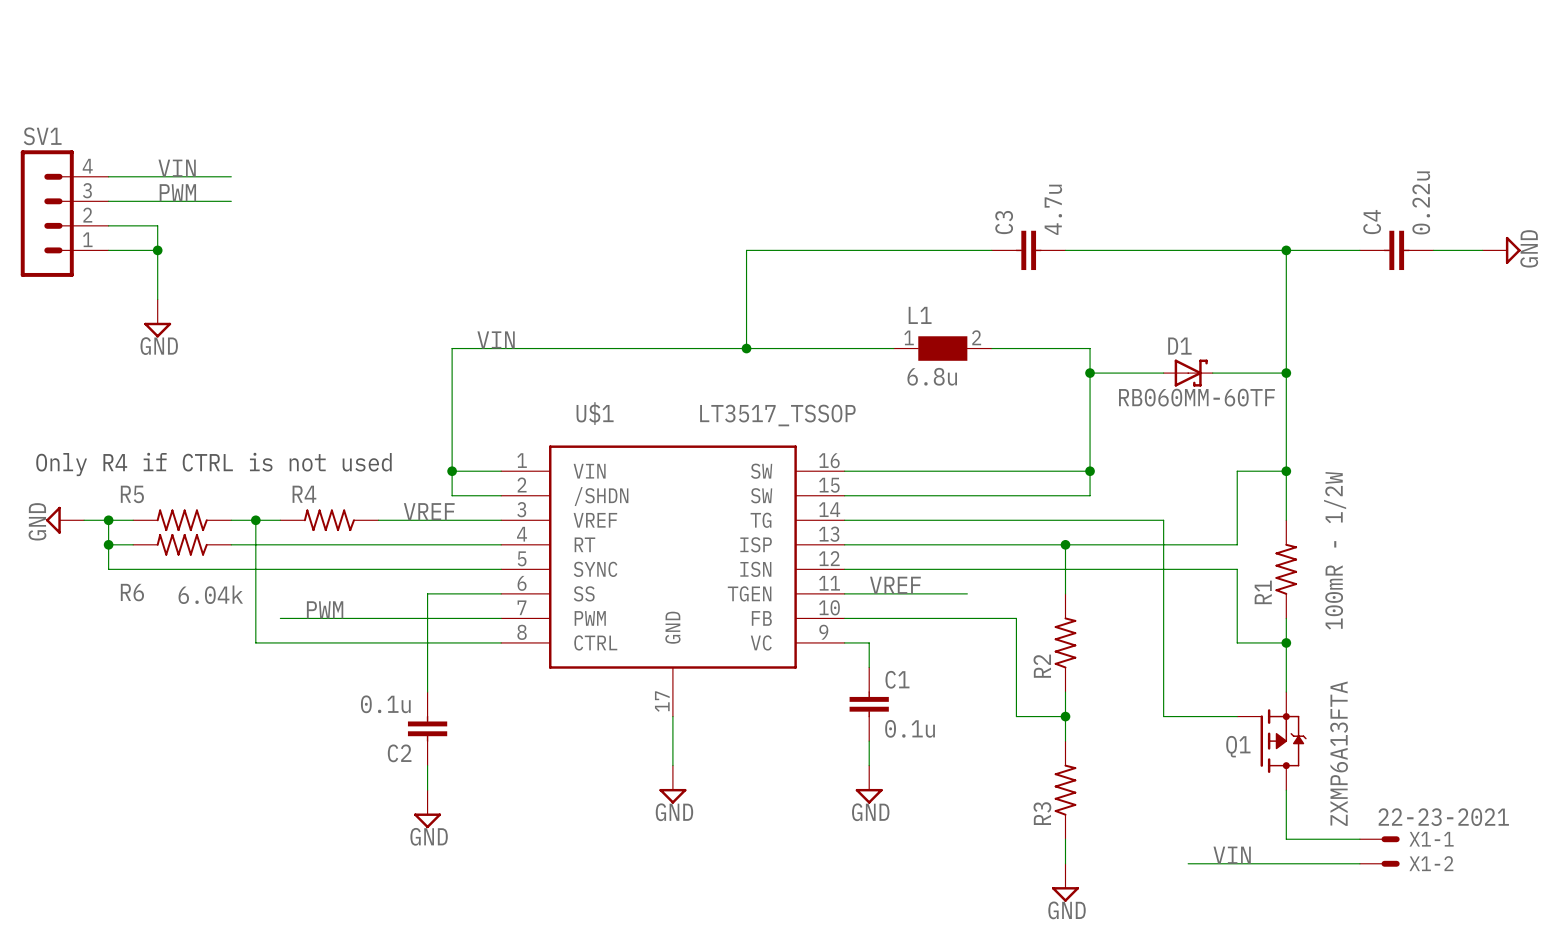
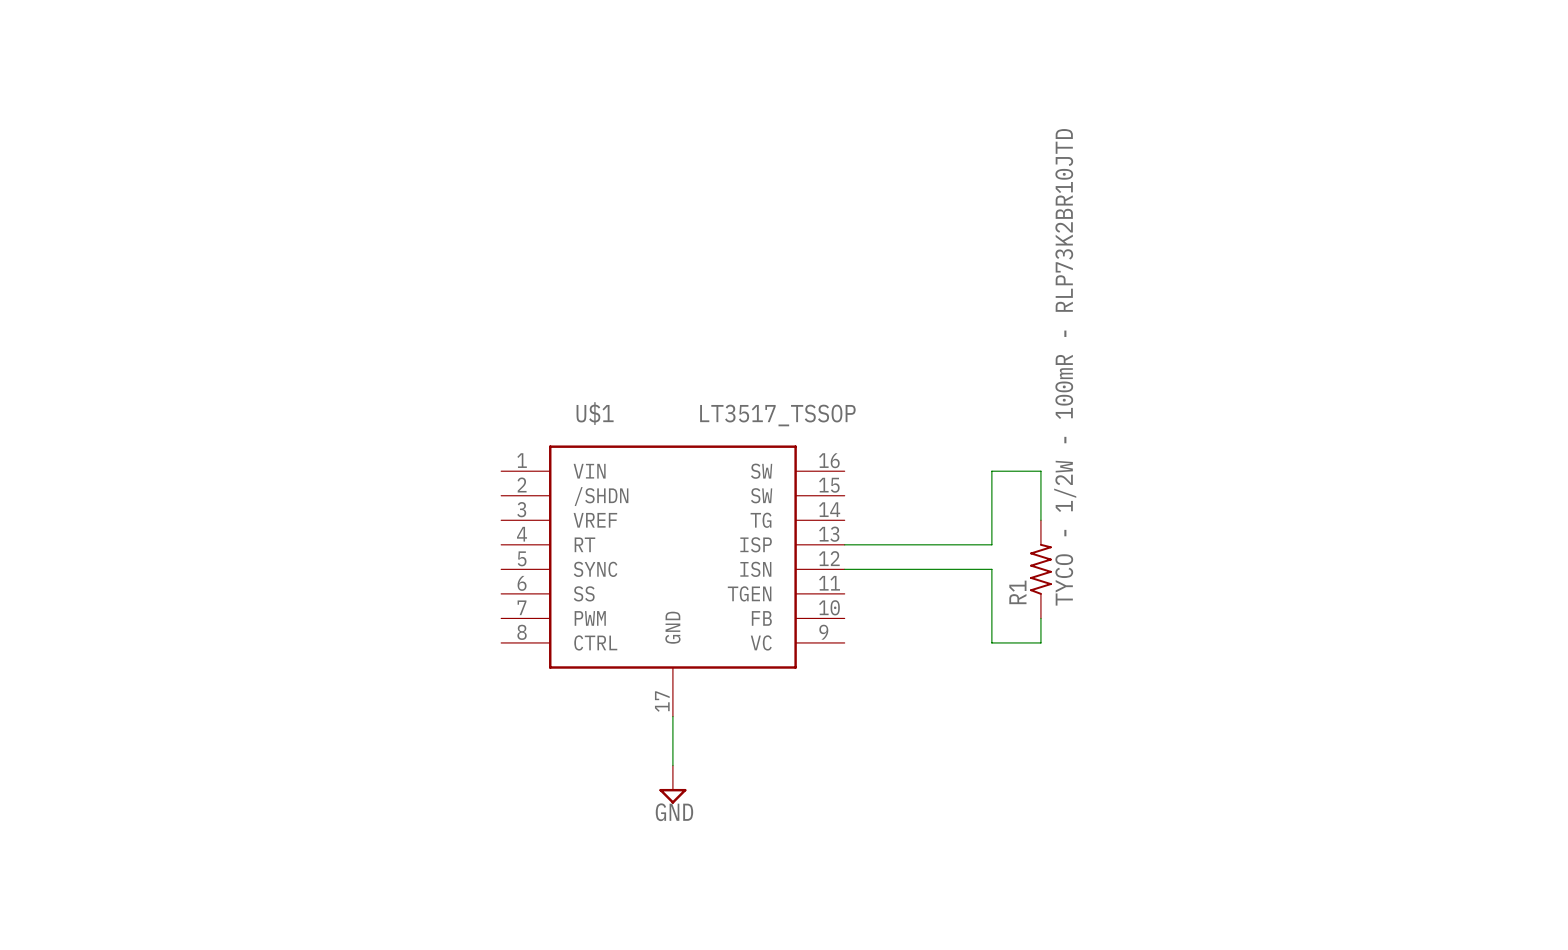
label: VIN (177, 168) -> none
wire: (108, 176) (231, 176) -> none
label: PWM (177, 192) -> none
wire: (108, 201) (231, 201) -> none
SV1: (64, 213) -> none
wire: (108, 225) (157, 225) (157, 299) -> none
wire: (108, 250) (157, 250) -> none
junction: (157, 250) -> none
wire: (991, 250) (746, 250) (746, 348) -> none
C3: 4.7u (1028, 250) -> none
wire: (1065, 250) (1359, 250) -> none
wire: (1286, 250) (1286, 520) -> none
junction: (1286, 250) -> none
C4: 0.22u (1396, 250) -> none
wire: (1433, 250) (1482, 250) -> none
power symbol: GND (1501, 250) -> none
power symbol: GND (157, 318) -> none
label: VIN (496, 339) -> none
junction: (746, 348) -> none
wire: (893, 348) (452, 348) (452, 495) (501, 495) -> none
L1: 6.8u (942, 348) -> none
wire: (991, 348) (1090, 348) (1090, 495) (844, 495) -> none
wire: (1090, 373) (1163, 373) -> none
junction: (1090, 373) -> none
D1: RB060MM-60TF (1188, 373) -> none
wire: (1212, 373) (1286, 373) -> none
junction: (1286, 373) -> none
text: Only R4 if CTRL is not used (213, 464) -> none
wire: (452, 471) (501, 471) -> none
junction: (452, 471) -> none
wire: (844, 471) (991, 471) -> (991, 544) (991, 471)
wire: (1040, 471) (1090, 471) -> (1040, 471) (1040, 520)
junction: (1090, 471) -> none
wire: (1286, 471) (1237, 471) (1237, 544) (991, 544) -> none
junction: (1286, 471) -> none
label: VREF (429, 511) -> none
power symbol: GND (65, 520) -> none
wire: (84, 520) (133, 520) -> none
wire: (108, 520) (108, 569) (501, 569) -> none
junction: (108, 520) -> none
R5: (182, 520) -> none
wire: (231, 520) (280, 520) -> none
wire: (255, 520) (255, 642) (501, 642) -> none
junction: (255, 520) -> none
R4: (329, 520) -> none
wire: (378, 520) (501, 520) -> none
wire: (844, 520) (1163, 520) (1163, 716) (1237, 716) -> none
wire: (108, 544) (133, 544) -> none
junction: (108, 544) -> none
R6: 6.04k (182, 544) -> none
wire: (231, 544) (501, 544) -> none
wire: (1065, 544) (1065, 593) -> none
junction: (1065, 544) -> none
R1 value: 100mR - 1/2W (1335, 550) -> TYCO - 1/2W - 100mR - RLP73K2BR10JTD (1065, 367)
wire: (991, 569) (1237, 569) (1237, 642) (1286, 642) -> (991, 569) (991, 642) (1040, 642) (1040, 618)
R1 position: (1286, 569) -> (1040, 569)
label: VREF (895, 585) -> none
wire: (501, 593) (427, 593) (427, 692) -> none
wire: (844, 593) (967, 593) -> none
label: PWM (325, 609) -> none
wire: (280, 618) (501, 618) -> none
wire: (844, 618) (1016, 618) (1016, 716) (1065, 716) -> none
wire: (1286, 618) (1286, 692) -> none
wire: (844, 642) (869, 642) (869, 667) -> none
R2: (1065, 642) -> none
junction: (1286, 642) -> none
wire: (1065, 692) (1065, 741) -> none
C1: 0.1u (869, 704) -> none
junction: (1065, 716) -> none
C2: 0.1u (427, 728) -> none
wire: (869, 741) (869, 765) -> none
Q1: ZXMP6A13FTA (1271, 741) -> none
wire: (427, 765) (427, 790) -> none
power symbol: GND (869, 784) -> none
R3: (1065, 790) -> none
wire: (1286, 790) (1286, 839) (1359, 839) -> none
power symbol: GND (427, 809) -> none
wire: (1065, 839) (1065, 863) -> none
X1-1: 22-23-2021 (1379, 839) -> none
label: VIN (1232, 855) -> none
wire: (1188, 863) (1359, 863) -> none
X1-2: (1379, 863) -> none
power symbol: GND (1065, 882) -> none

